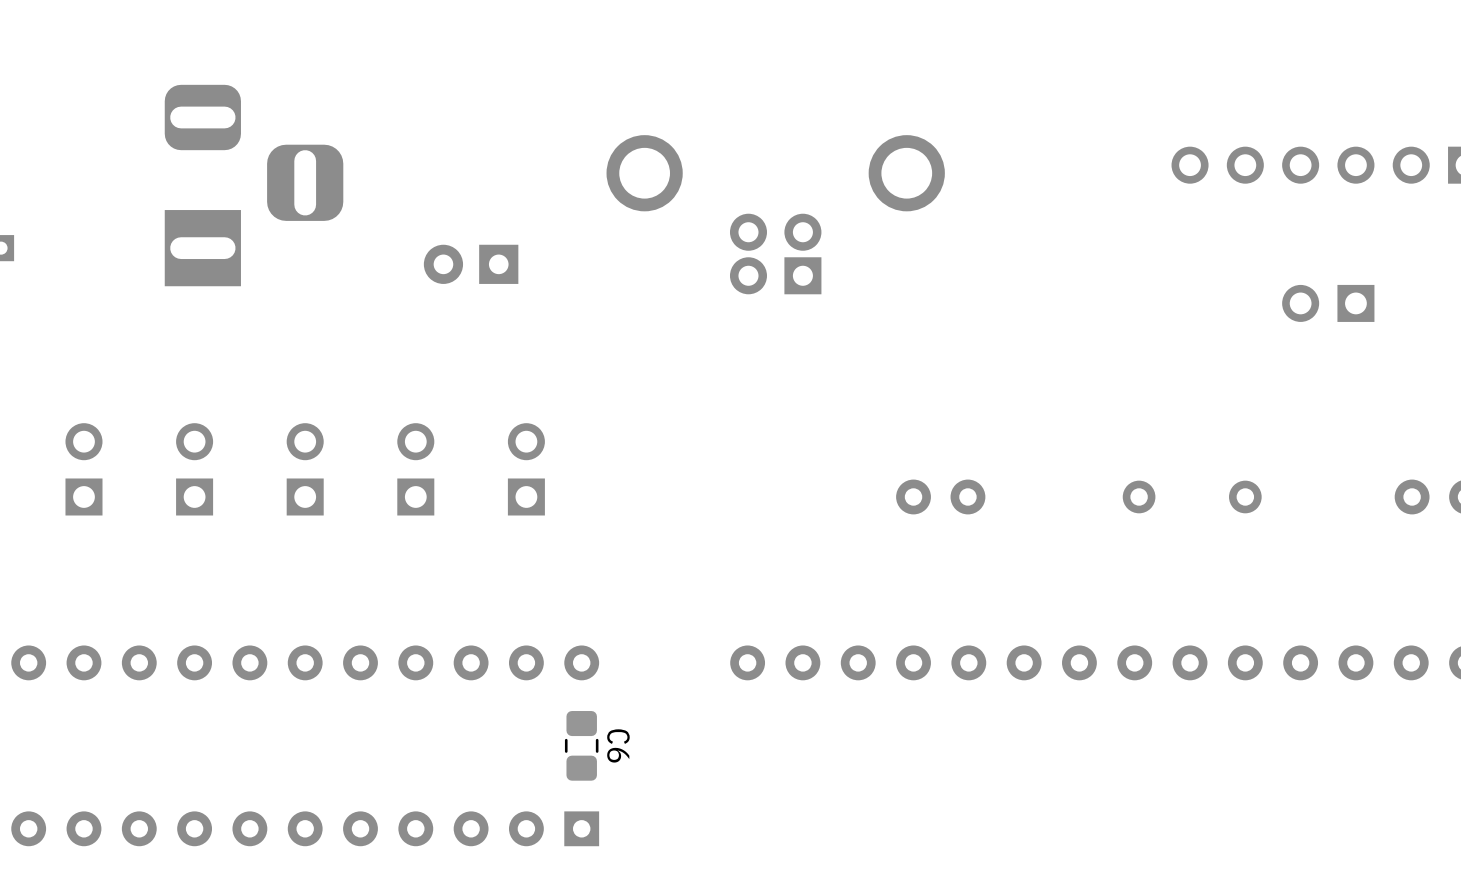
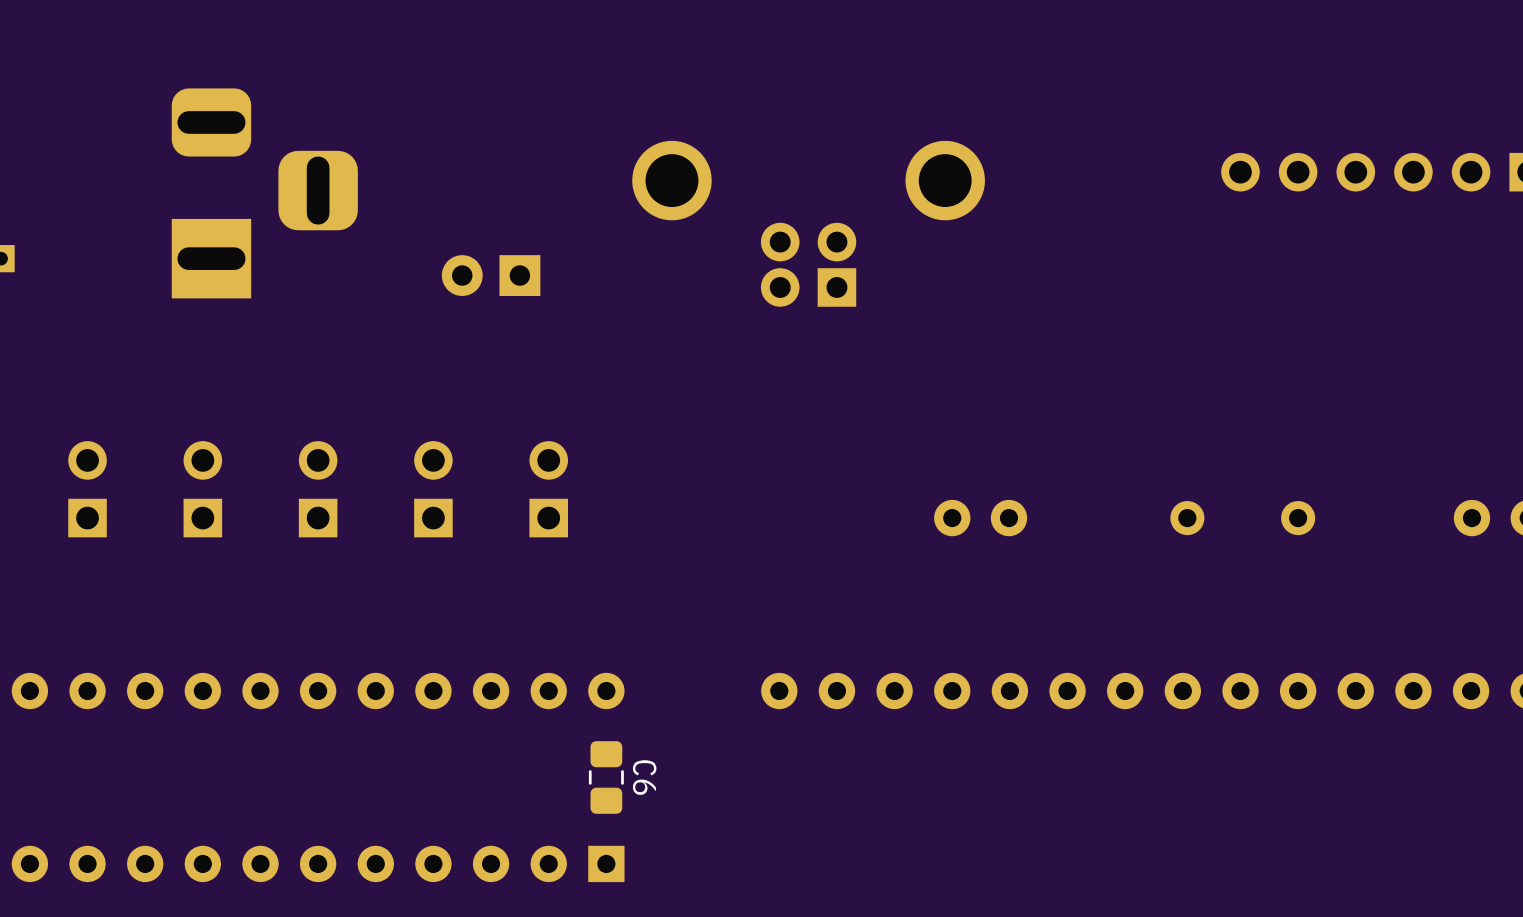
part: (1328, 303) -> none

